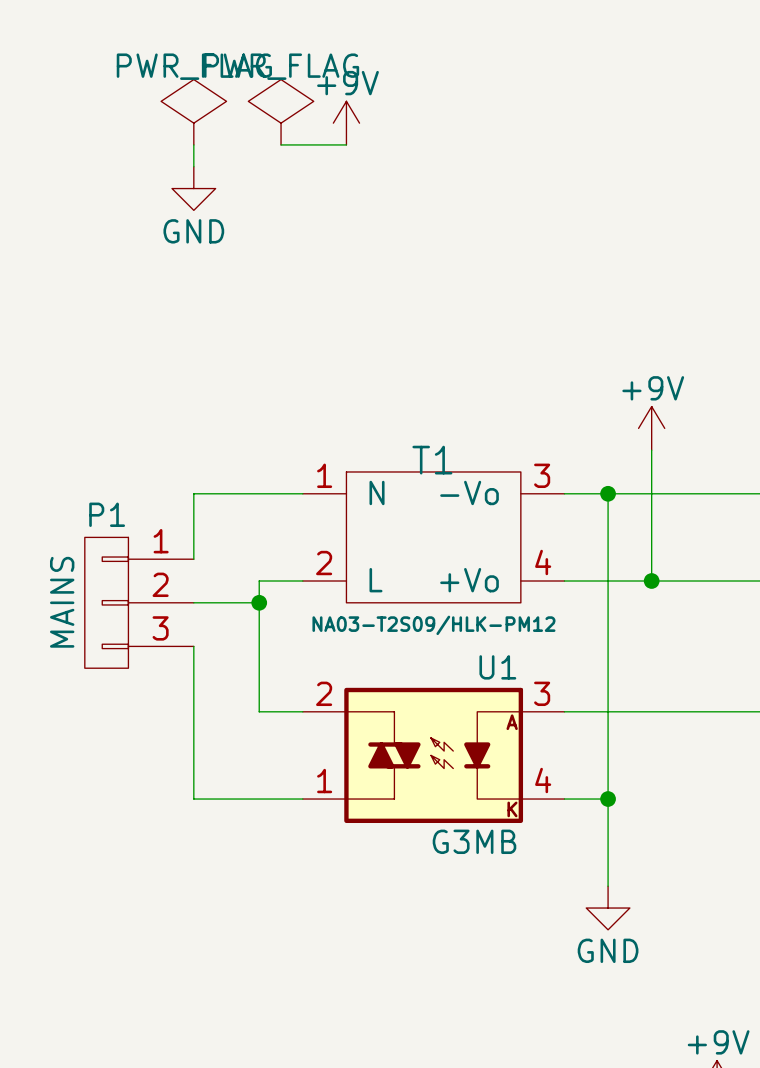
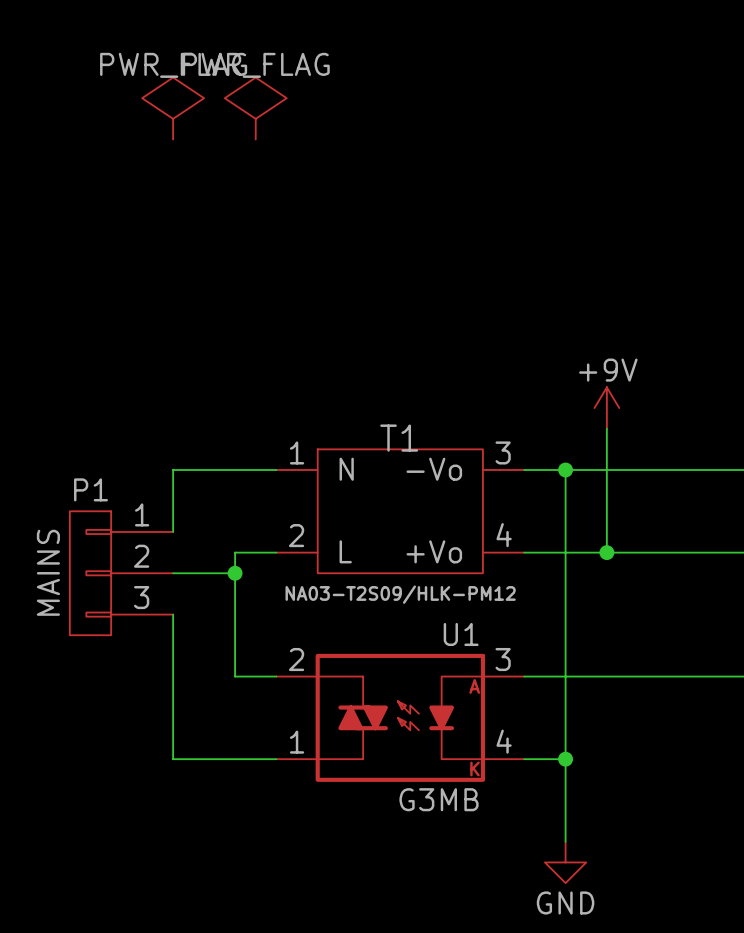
power symbol: +9V (346, 123) -> none
wire: (193, 144) (193, 166) -> none
wire: (281, 144) (346, 144) -> none
power symbol: GND (193, 188) -> none

